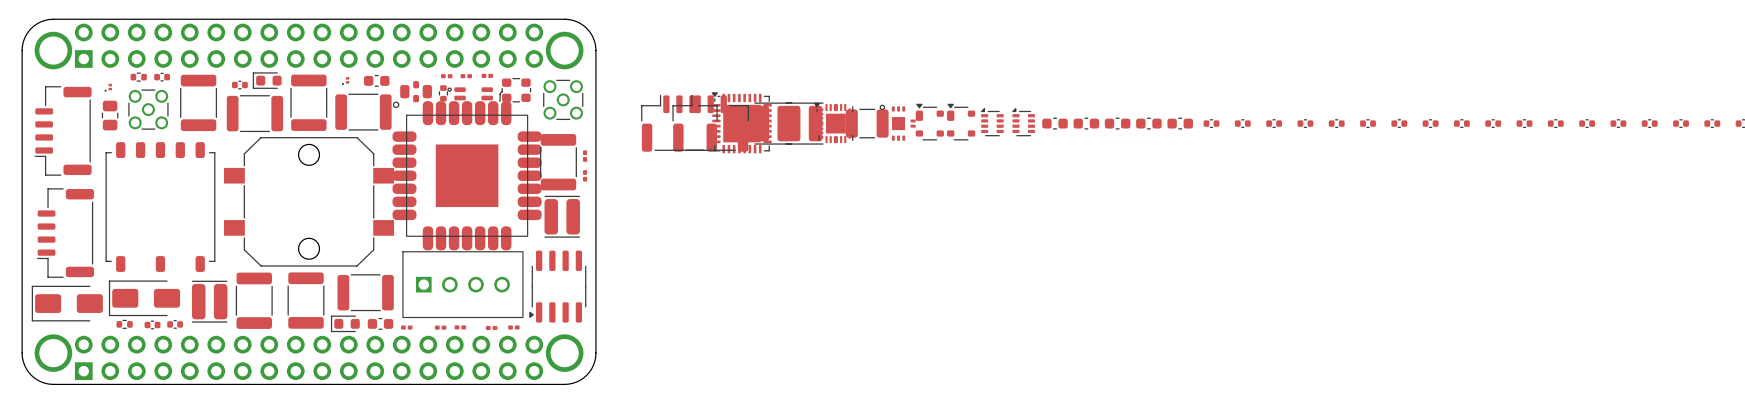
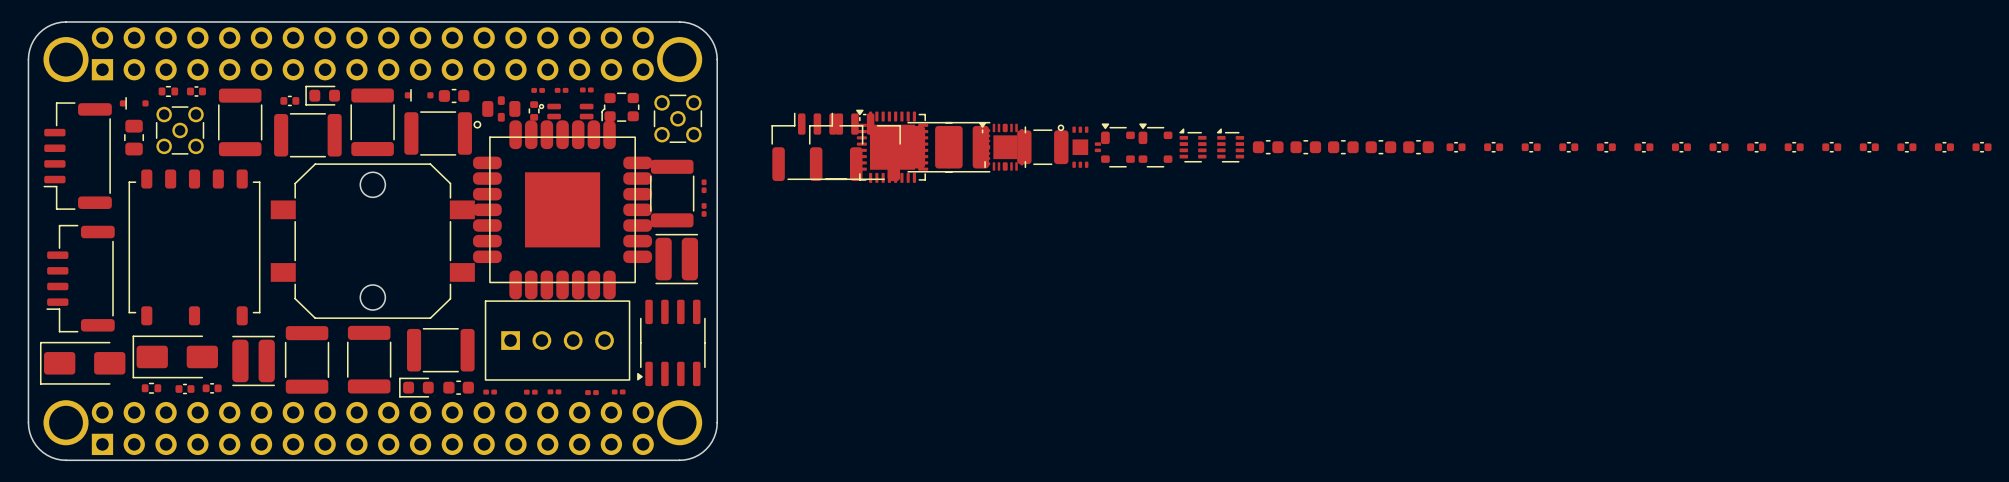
part footprint: [341, 77, 350, 86] -> [404, 88, 434, 102]
part footprint: [104, 83, 112, 92] -> [119, 97, 149, 110]

